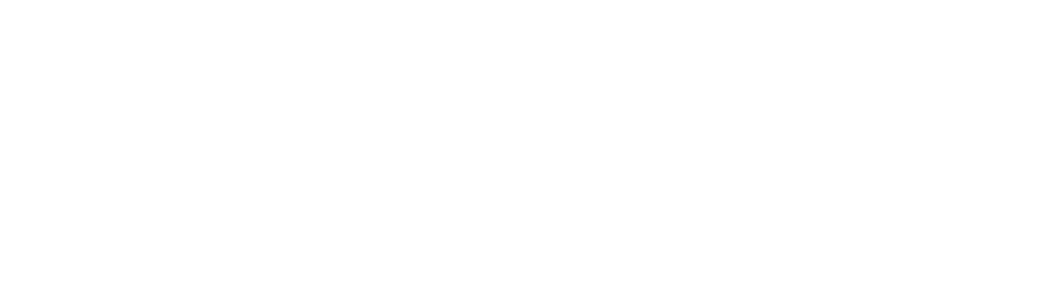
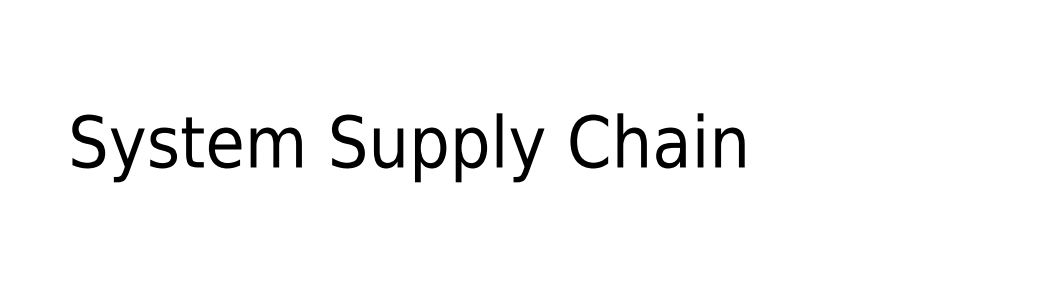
text: none -> System Supply Chain (408, 147)

